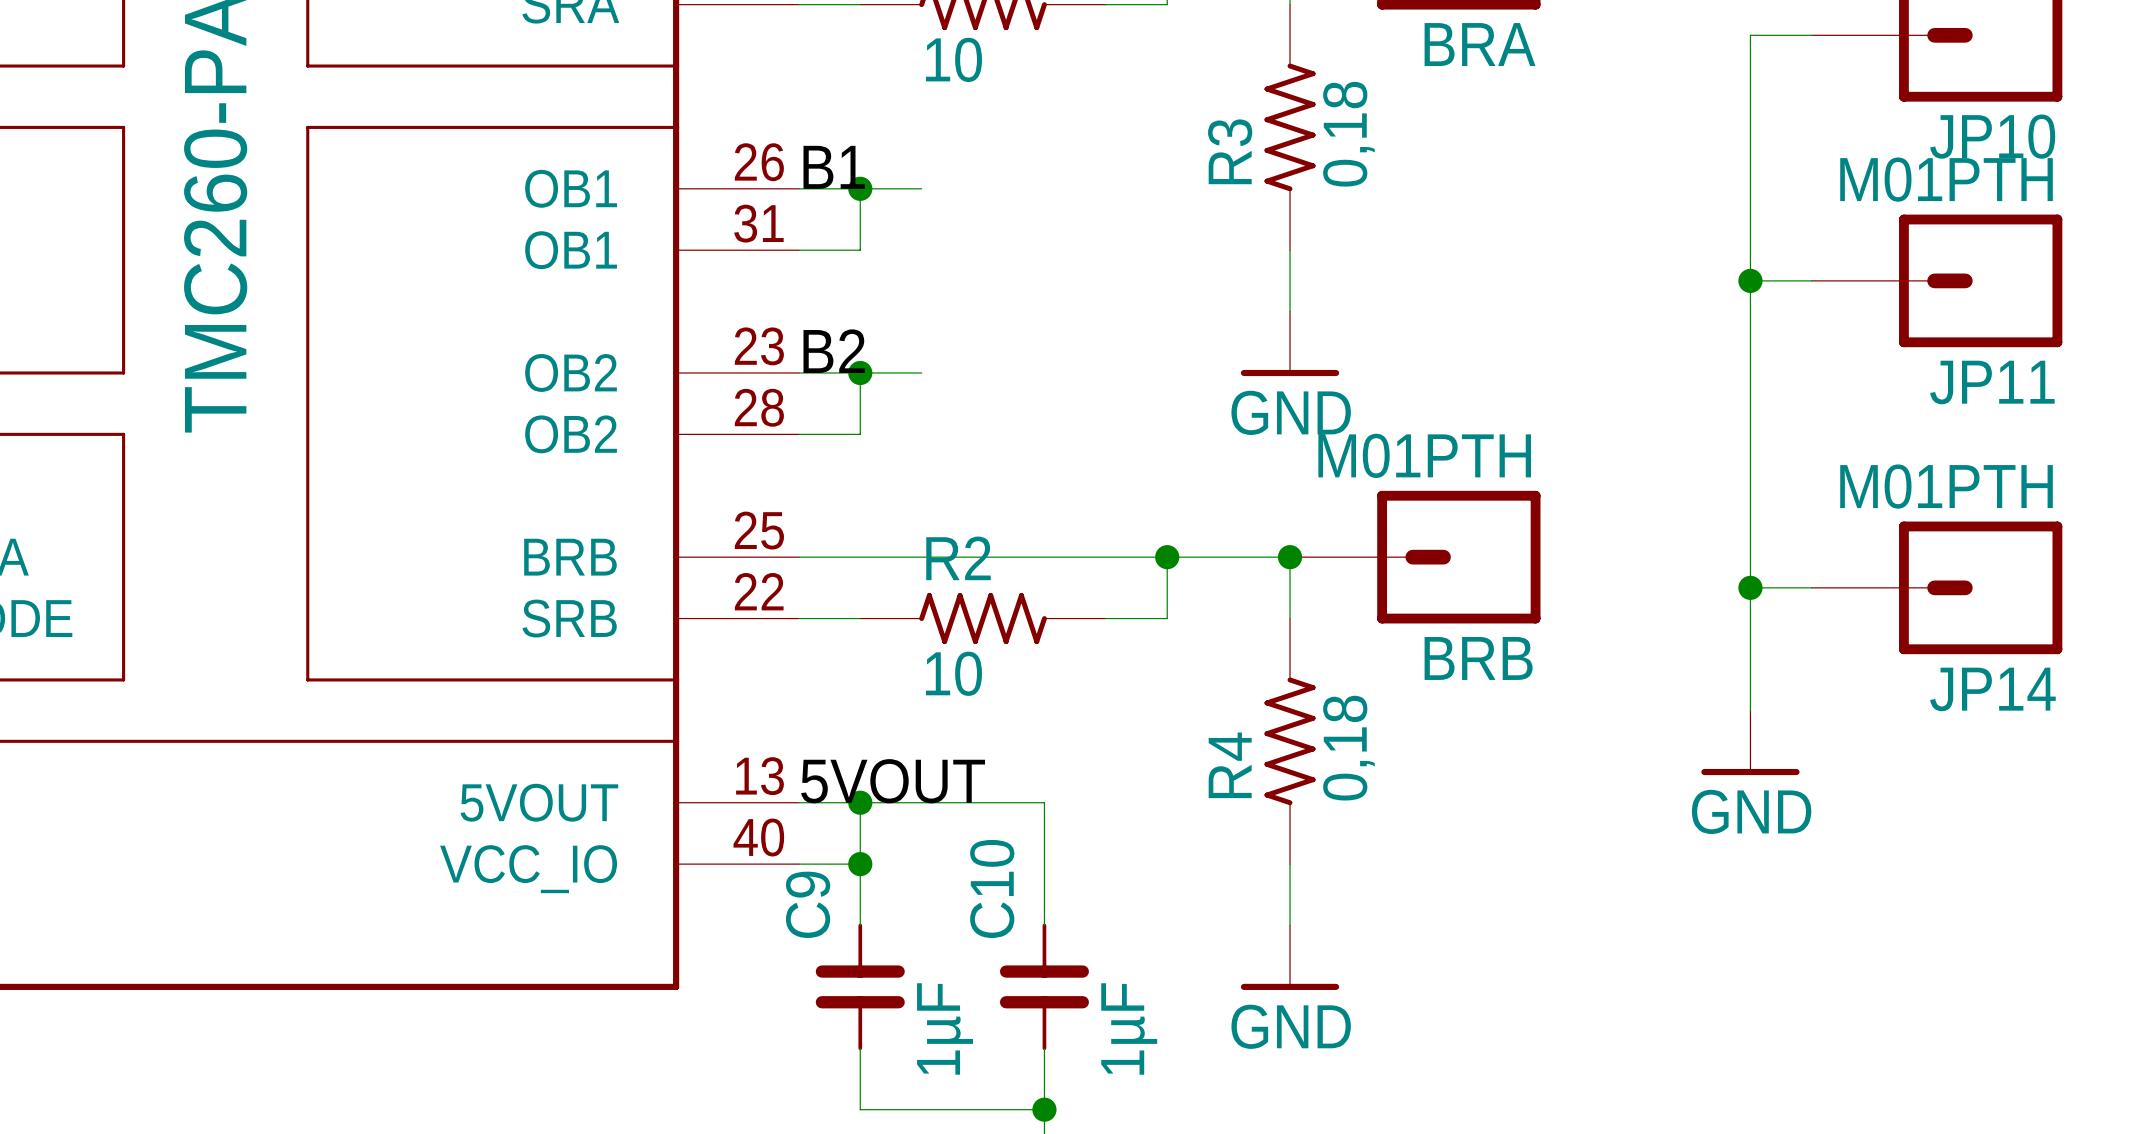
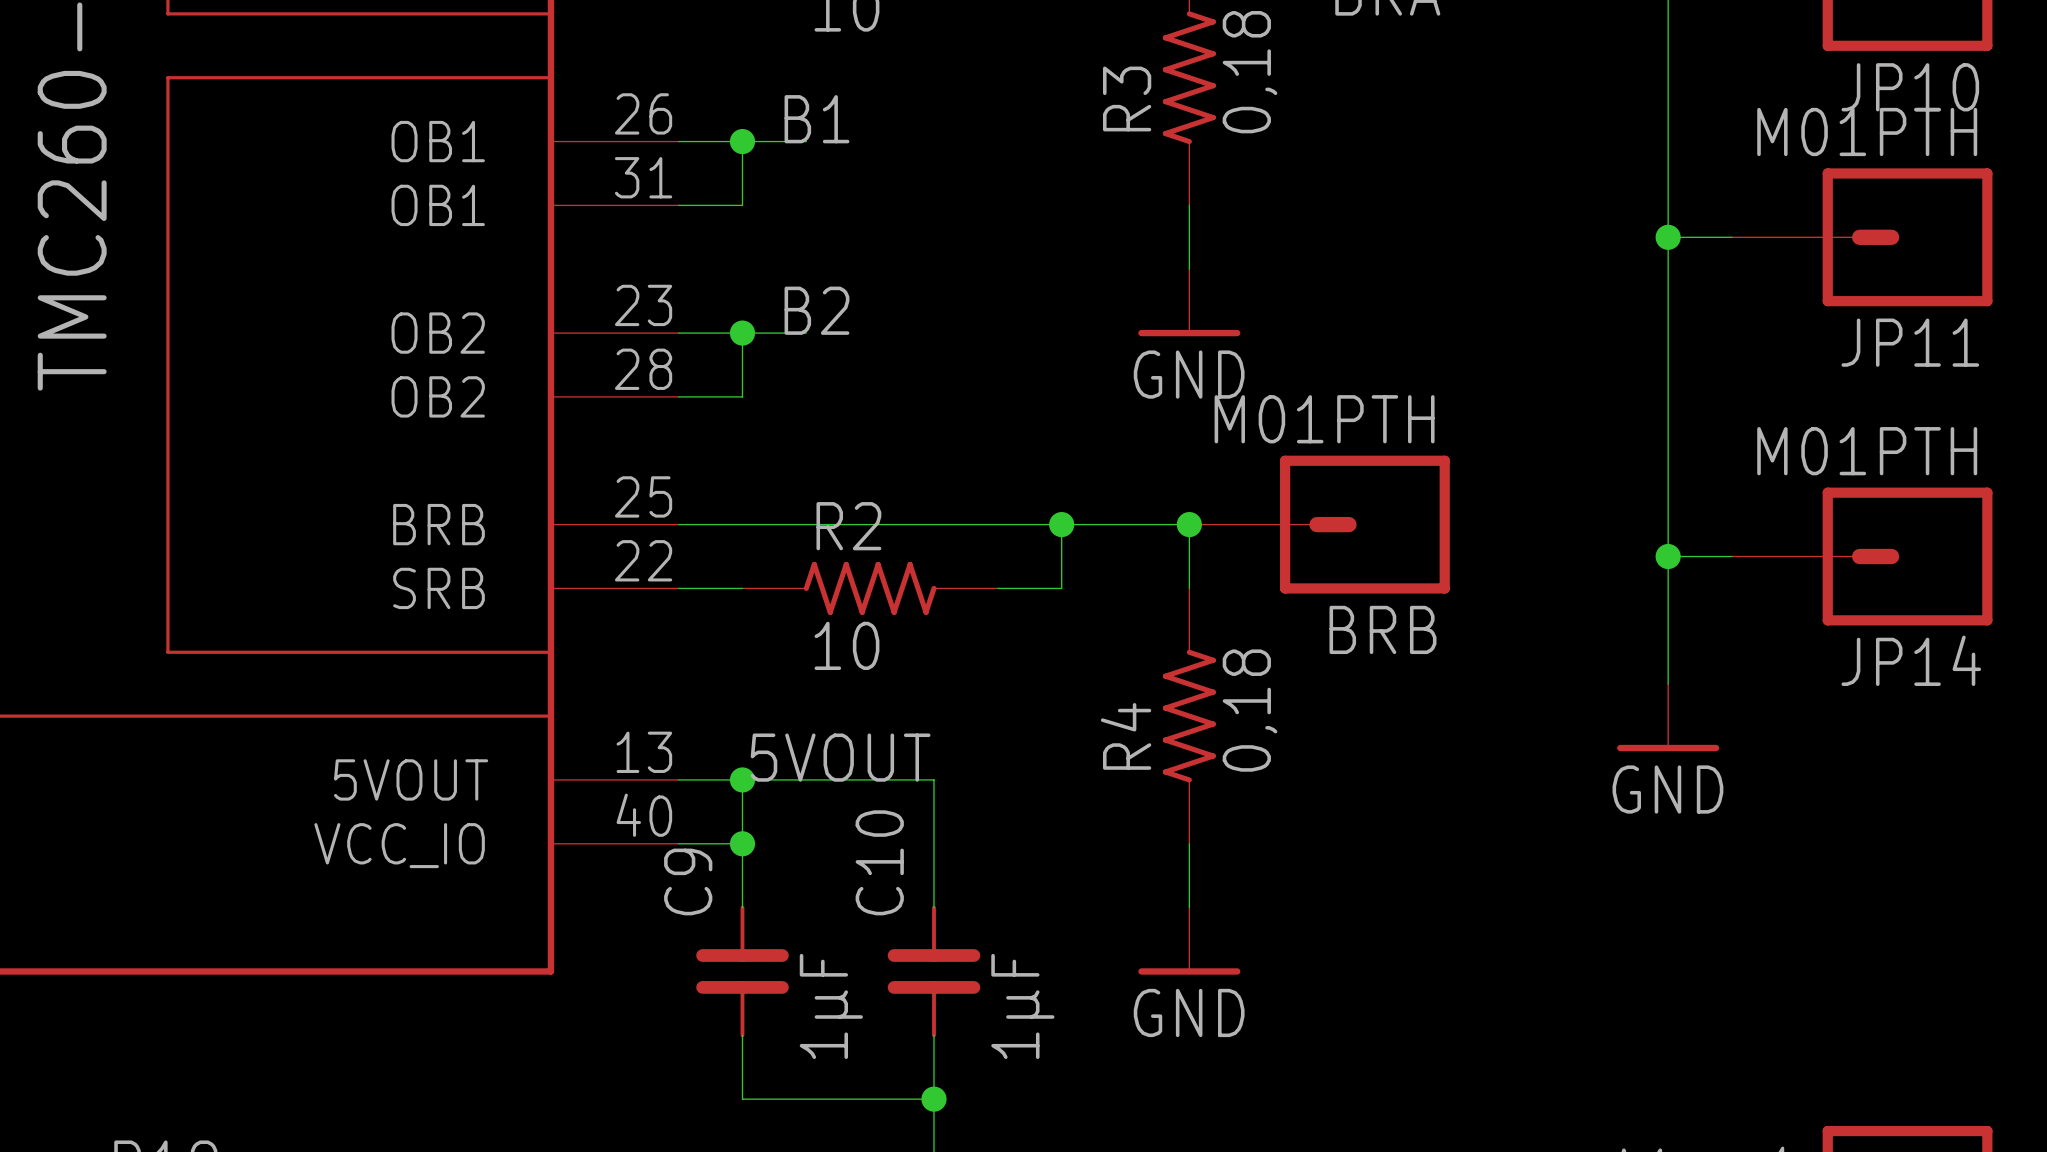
label position: B1 (834, 167) -> B1 (816, 119)
label position: B2 (834, 351) -> B2 (816, 310)
label position: 5VOUT (893, 781) -> 5VOUT (840, 757)

